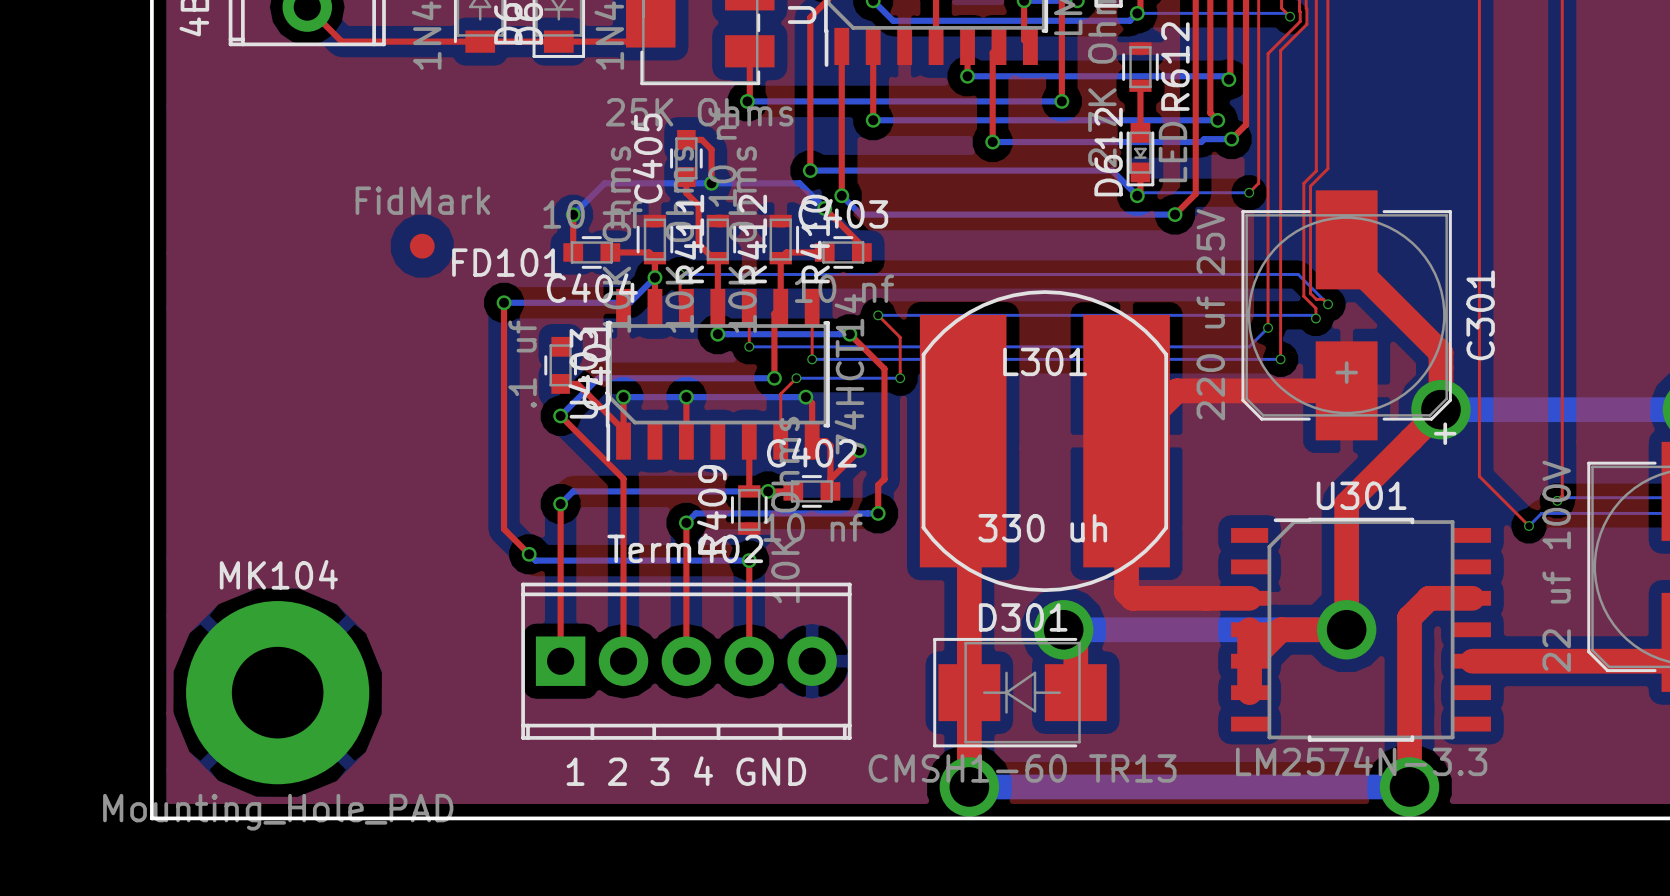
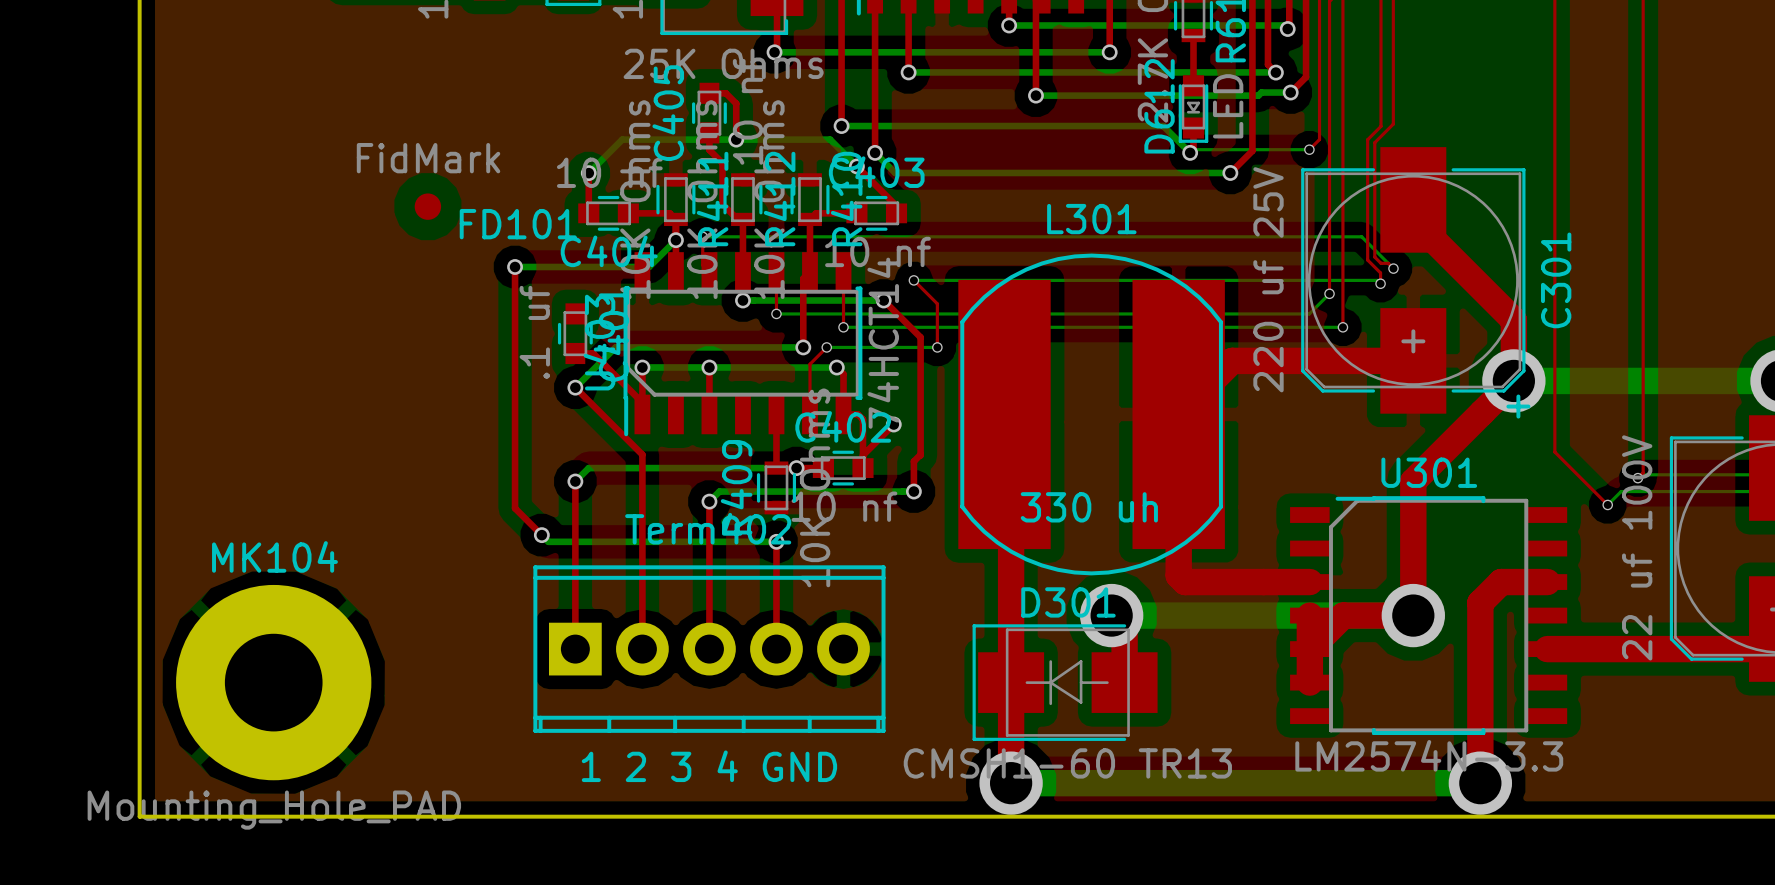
L301 name position: L301 (1045, 361) -> L301 (1091, 219)

